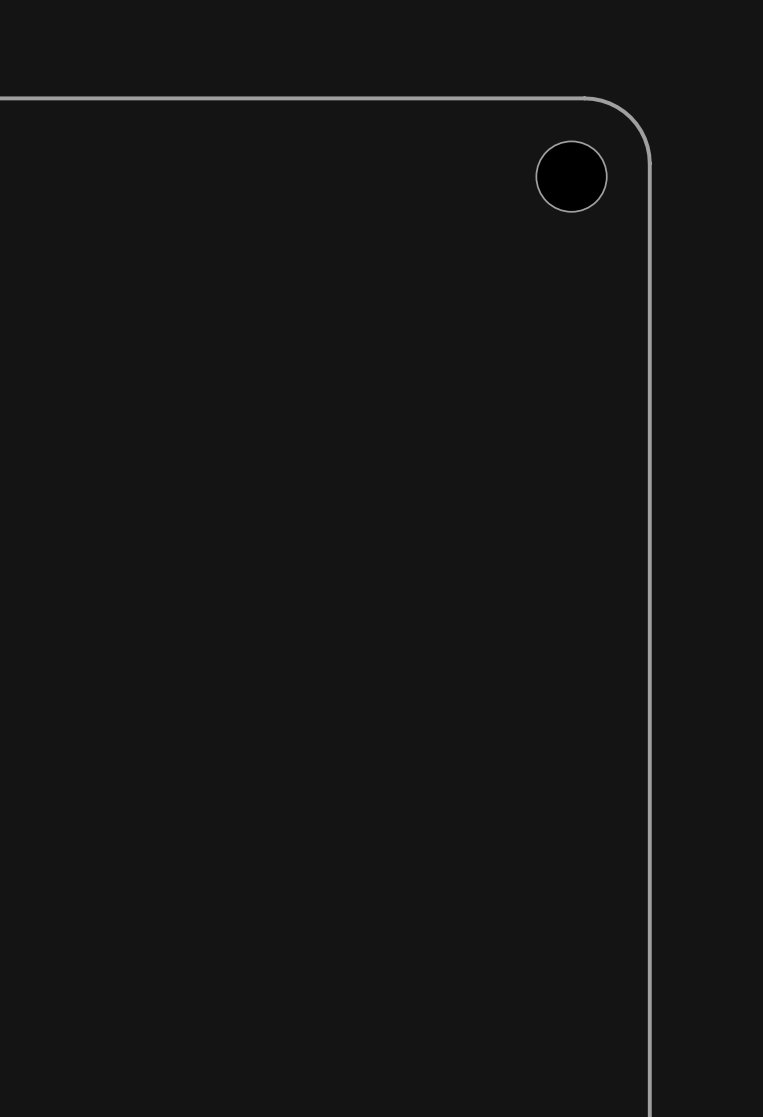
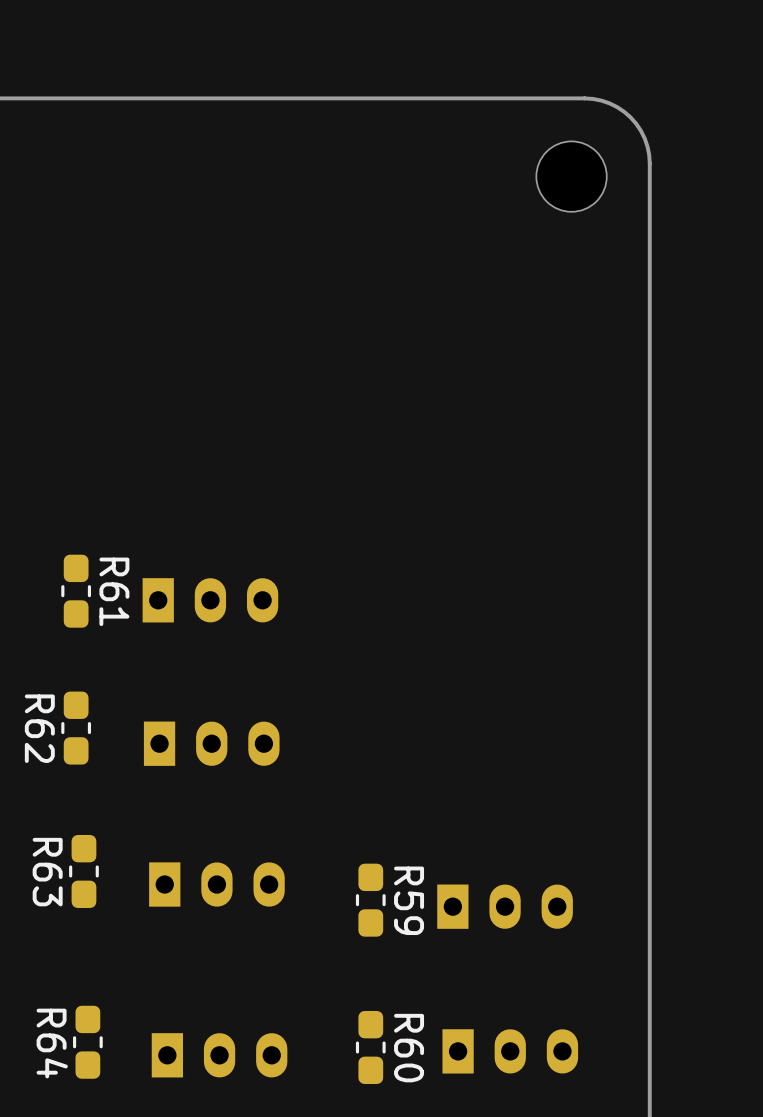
R61: none -> (76, 591)
part: none -> (210, 600)
R62: none -> (76, 728)
part: none -> (211, 743)
R63: none -> (83, 871)
part: none -> (216, 884)
R59: none -> (370, 900)
part: none -> (505, 906)
R64: none -> (87, 1042)
R60: none -> (370, 1047)
part: none -> (510, 1051)
part: none -> (219, 1055)

